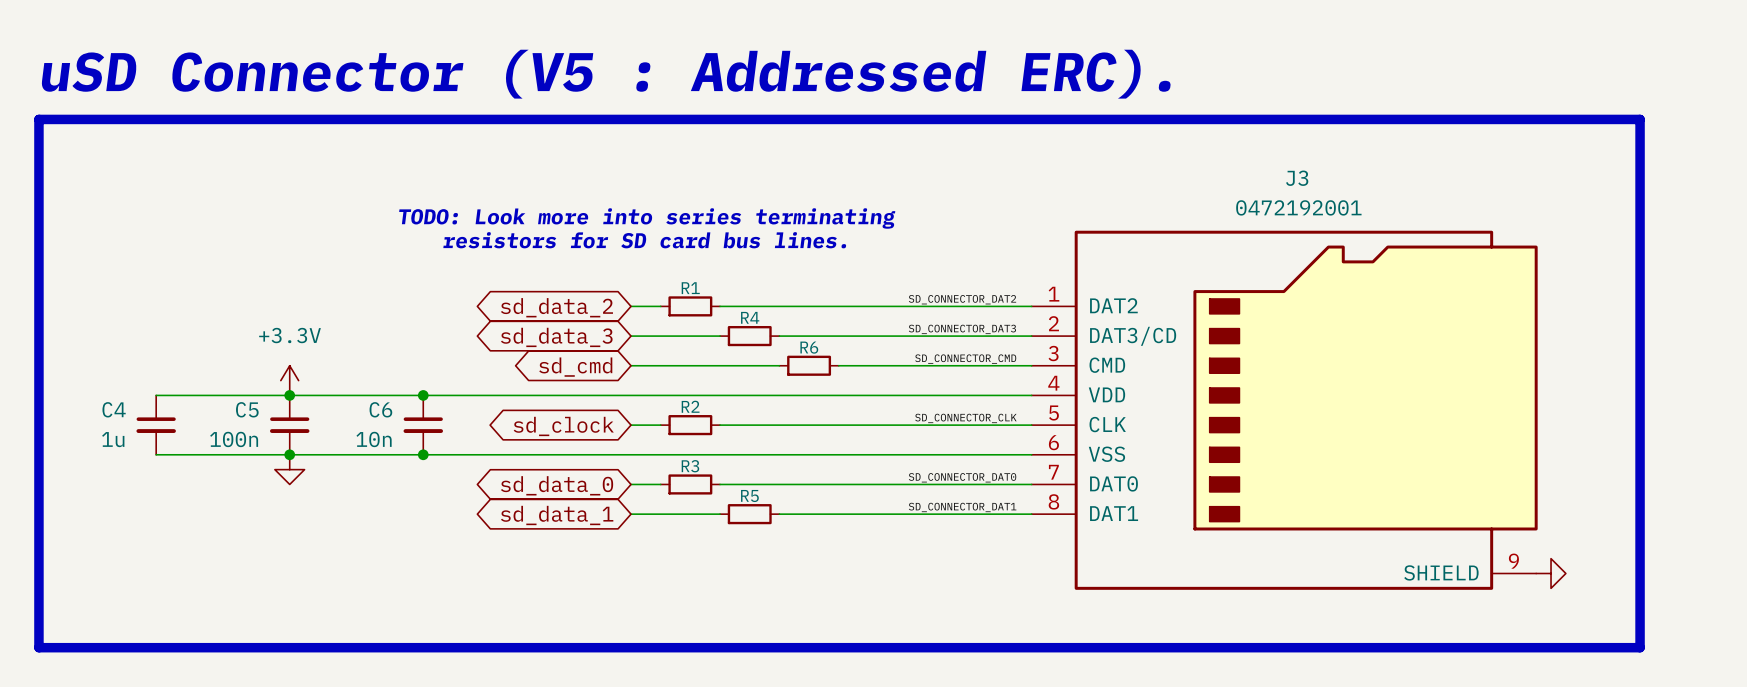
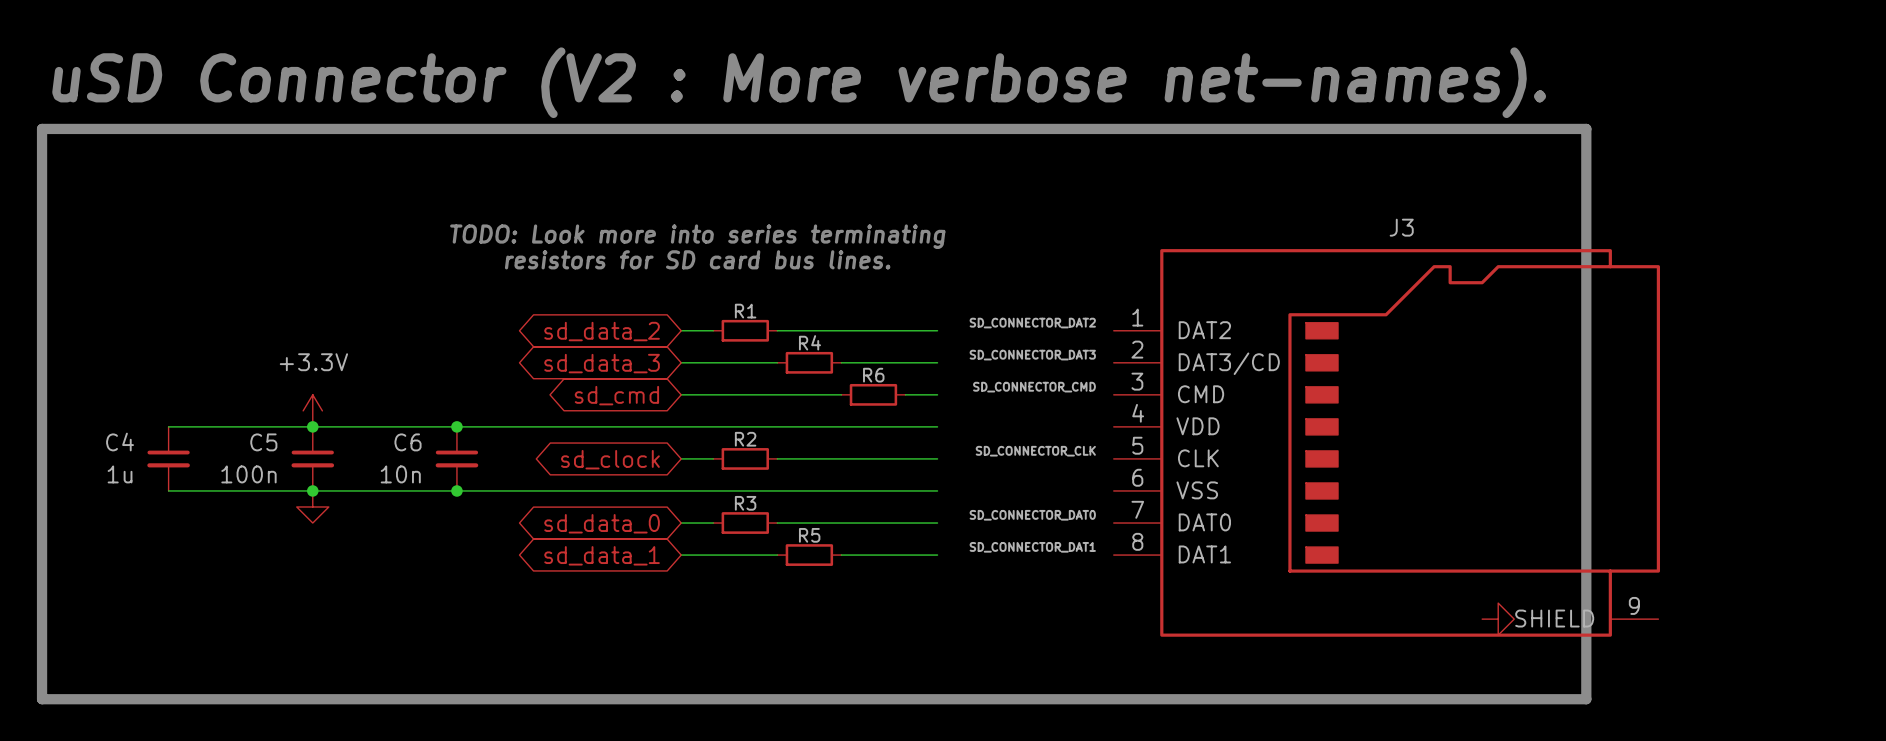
text: uSD Connector (V5 : Addressed ERC). (606, 74) -> uSD Connector (V2 : More verbose net-names). (799, 82)
line: (1469, 119) (1640, 119) (1640, 647) (1469, 647) -> (1586, 128) (1586, 699)
J3 name position: J3 (1297, 178) -> J3 (1401, 227)
J3 value: 0472192001 (1298, 207) -> none
wire: (868, 306) (1031, 306) -> none
wire: (868, 336) (1031, 336) -> none
wire: (868, 365) (1031, 365) -> none
wire: (868, 395) (1031, 395) -> none
wire: (868, 425) (1031, 425) -> none
wire: (868, 454) (1031, 454) -> none
wire: (868, 484) (1031, 484) -> none
wire: (868, 514) (1031, 514) -> none
power symbol position: (1551, 573) -> (1498, 619)

